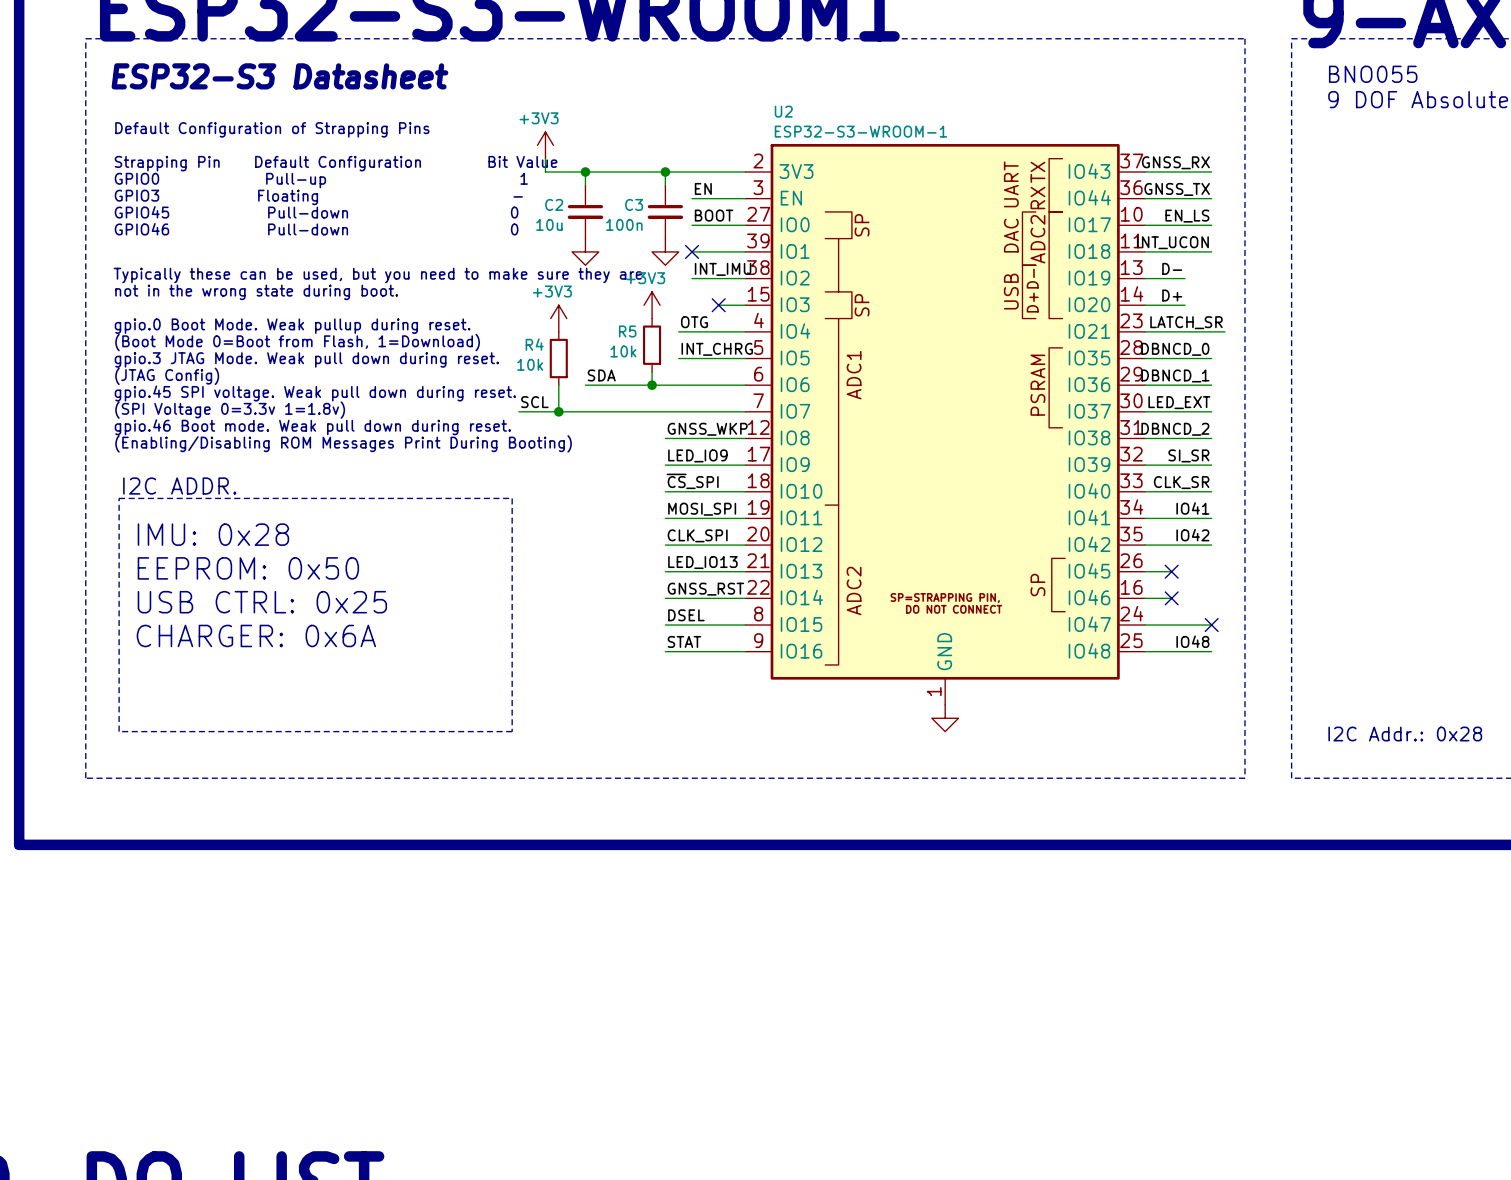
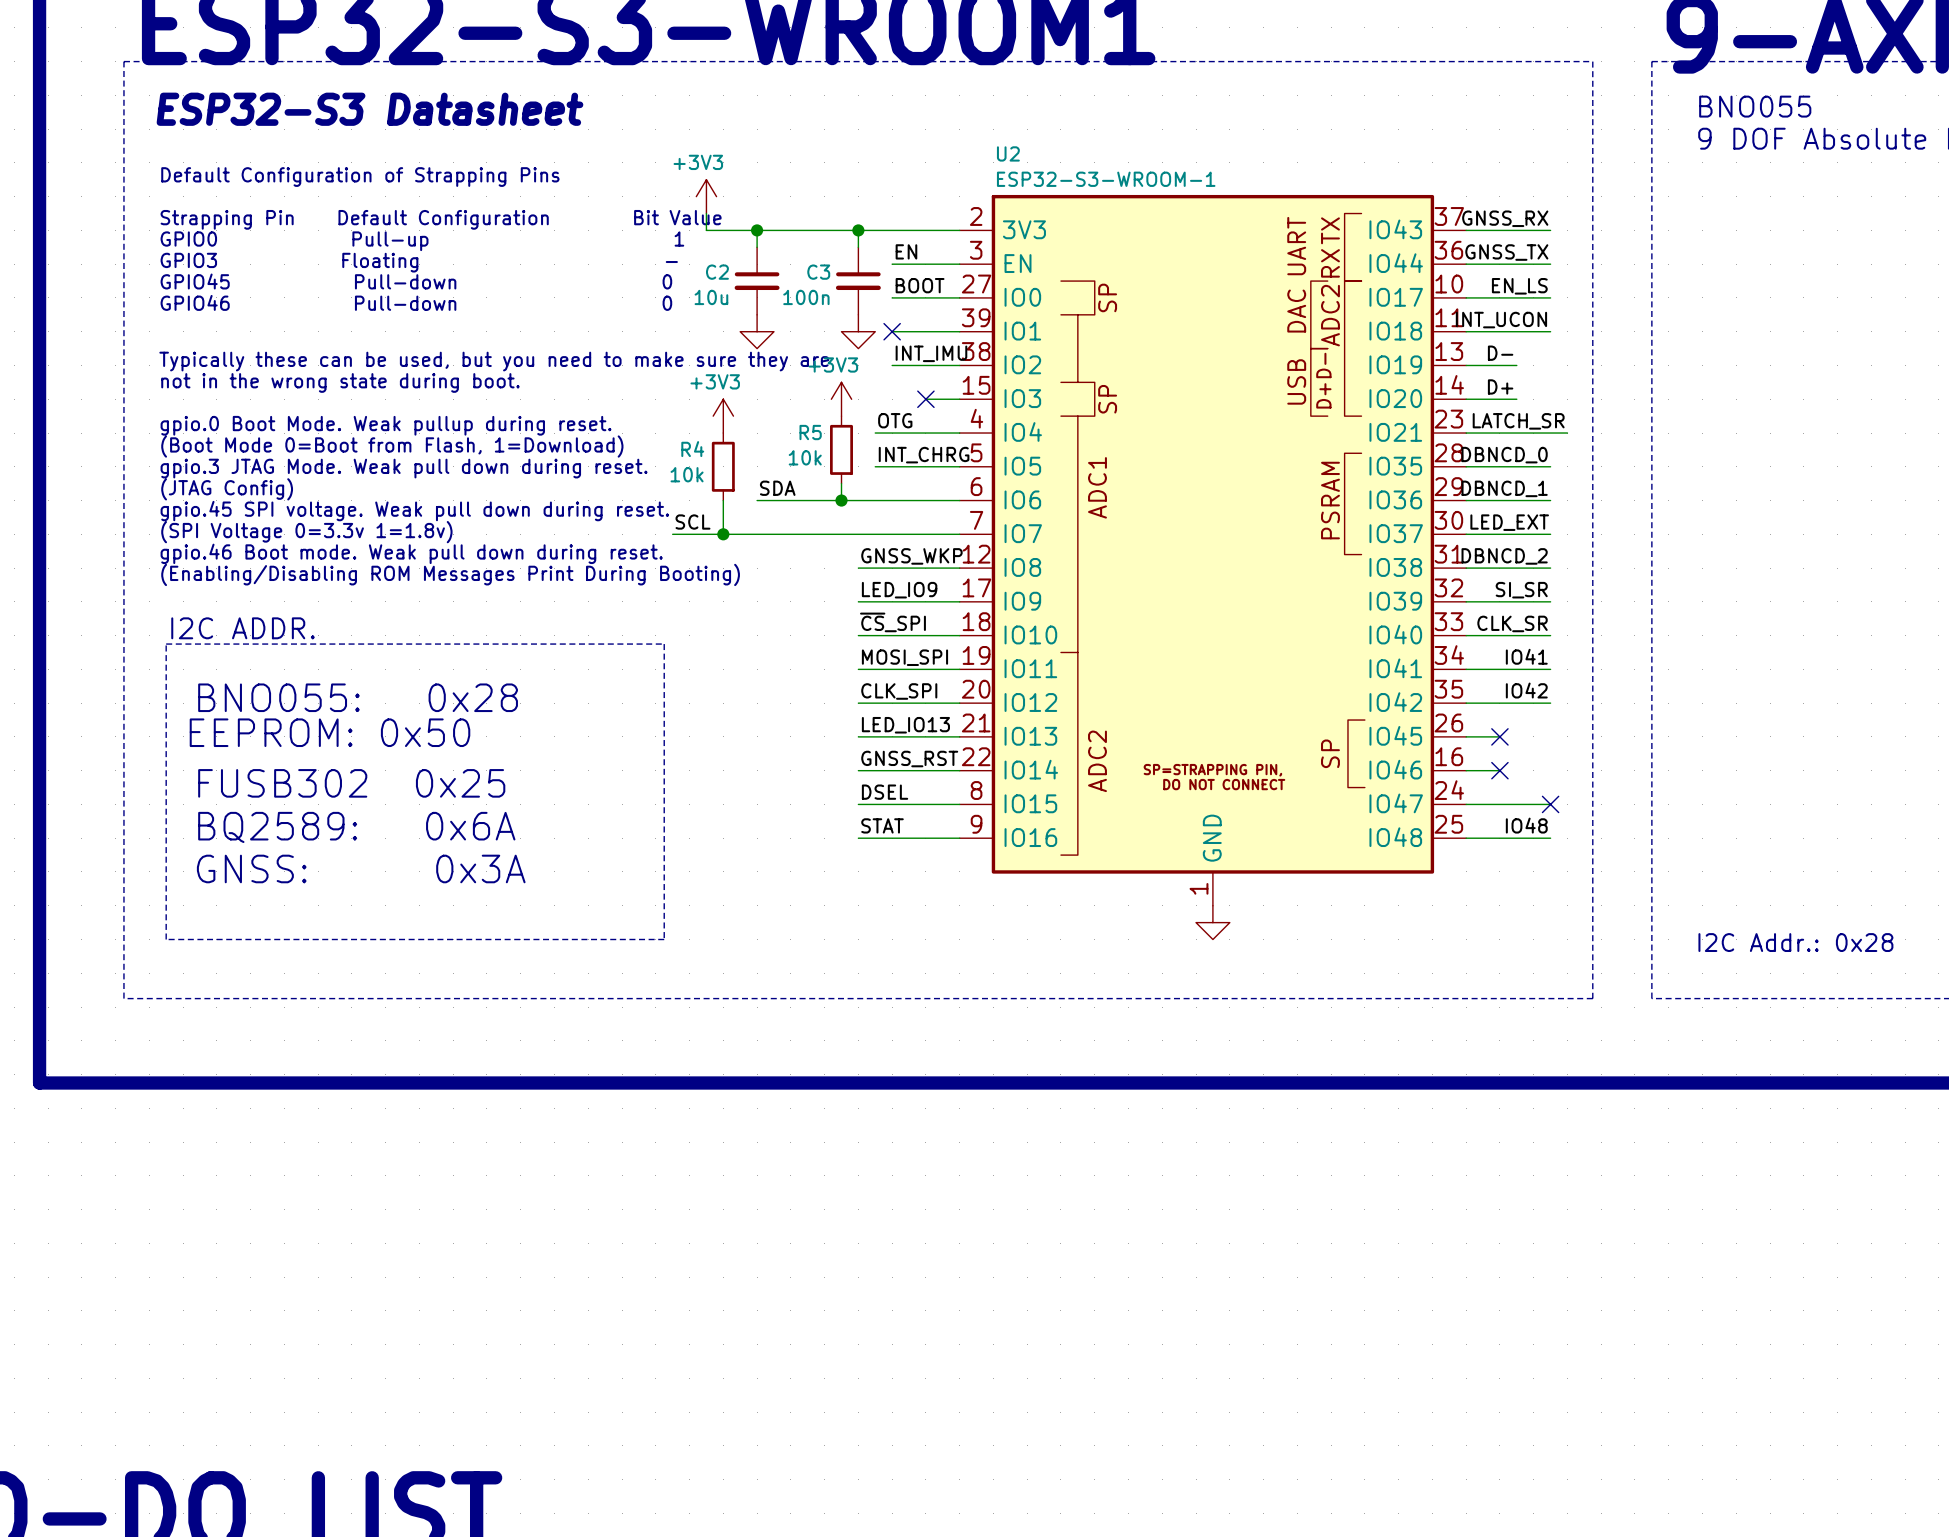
text: IMU: 0x28 (213, 534) -> BNO055: 0x28 (358, 697)
text: USB CTRL: 0x25 (262, 602) -> FUSB302 0x25 (351, 783)
text: CHARGER: 0x6A (256, 635) -> BQ2589: 0x6A (356, 827)
text: none -> GNSS: 0x3A (361, 868)

